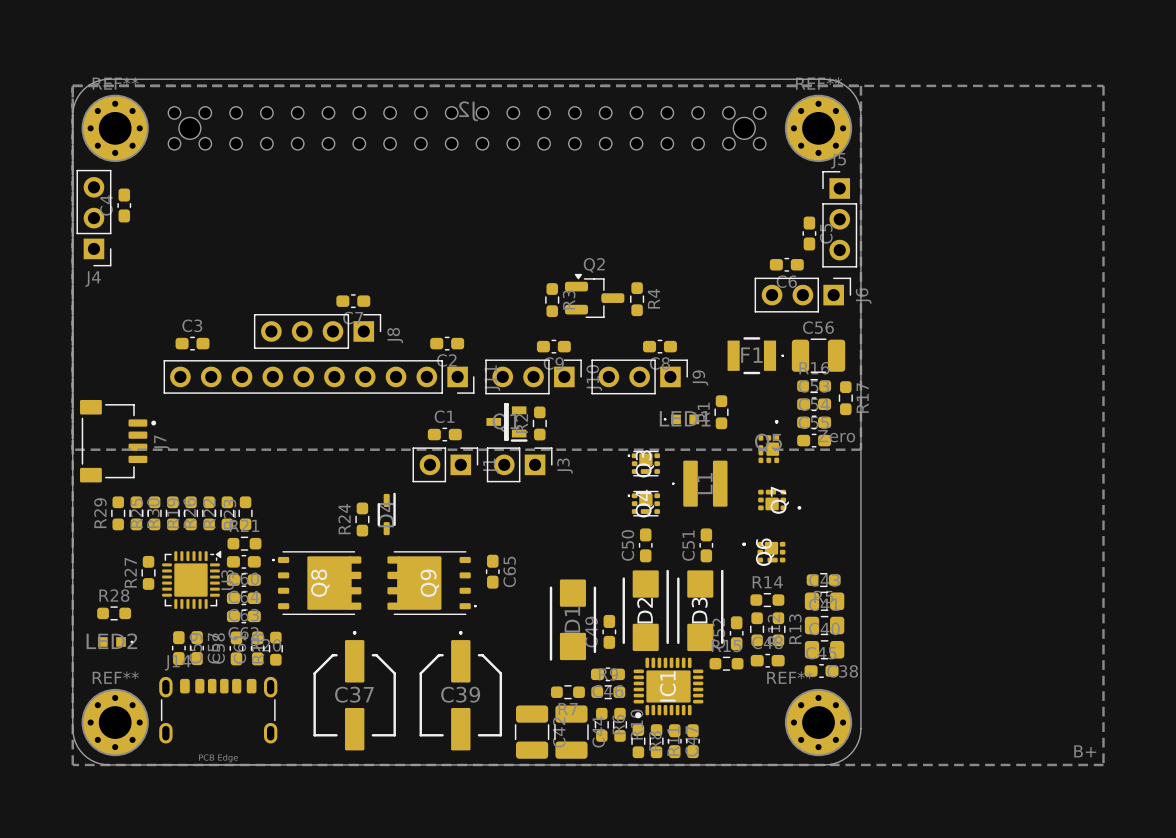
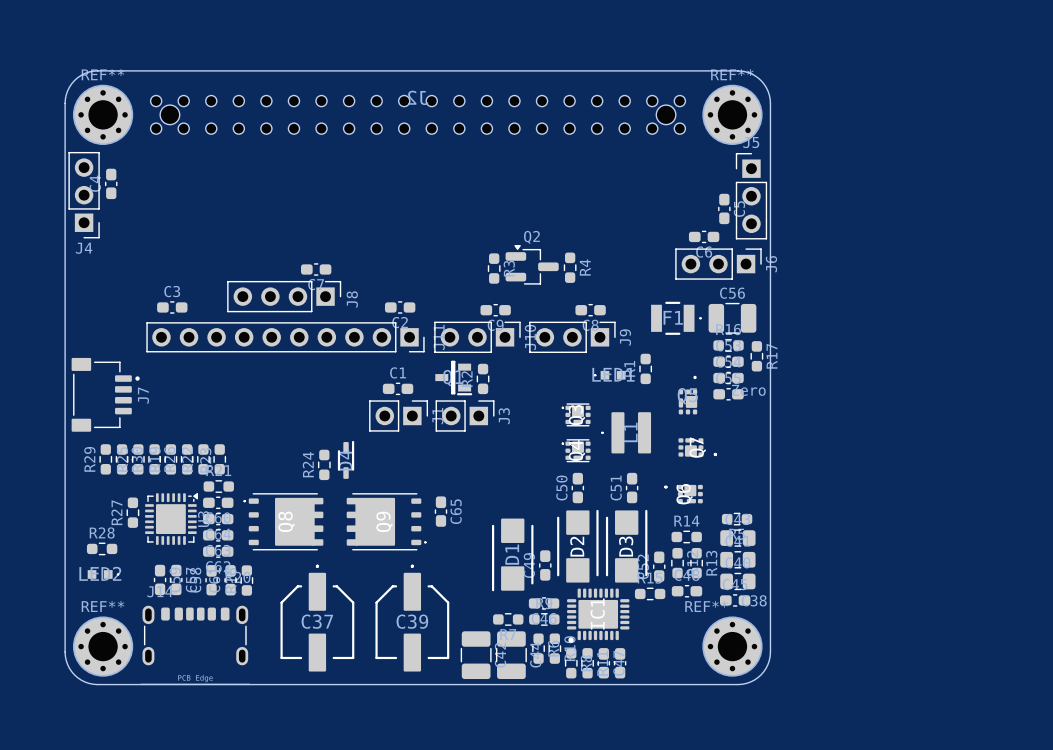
line: (72, 85) (1103, 85) (1103, 764) (72, 764) (72, 85) -> none
line: (860, 85) (860, 449) (72, 449) -> none
text: B+ (1085, 751) -> none

